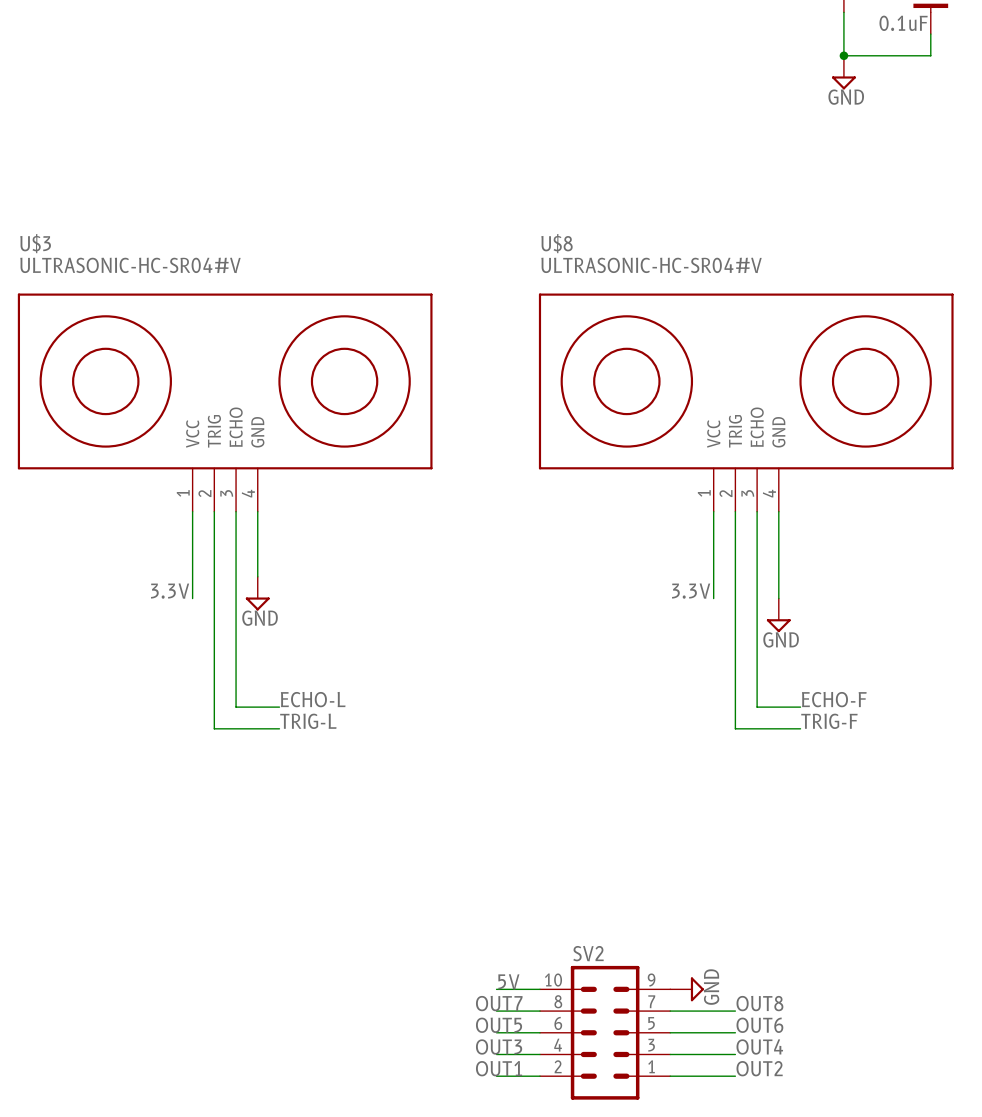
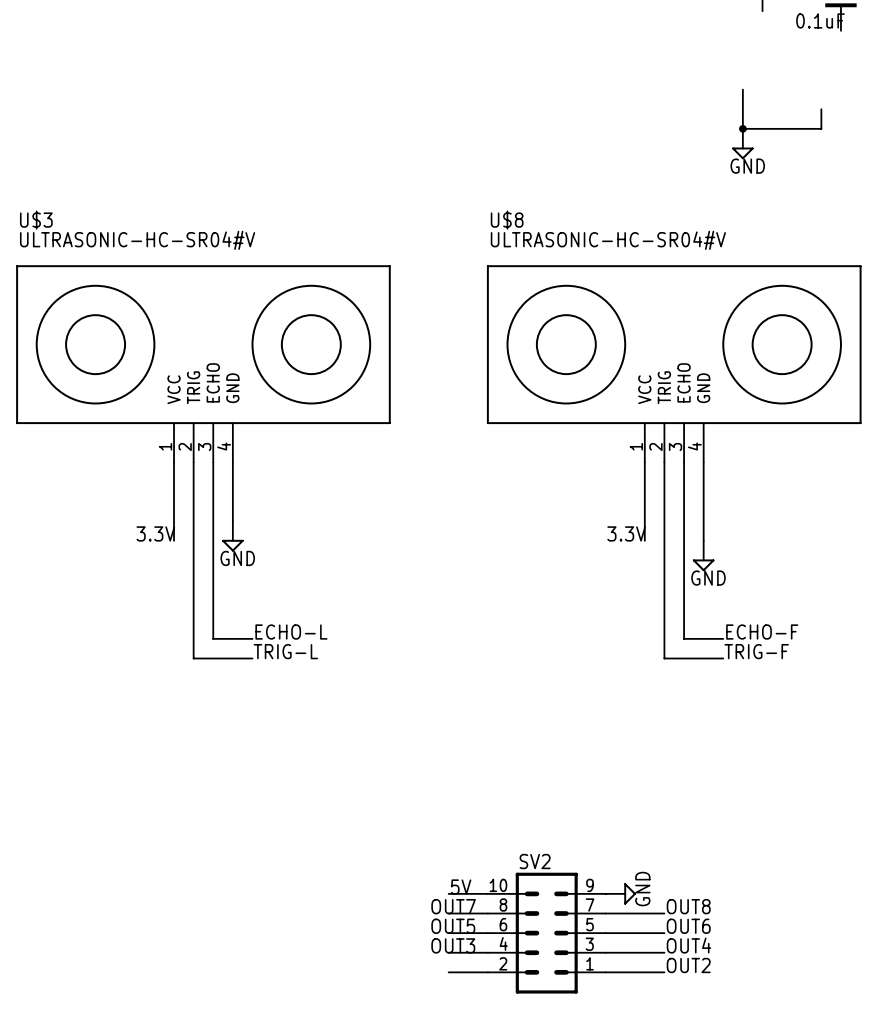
wire: (843, 12) (843, 55) (930, 55) (930, 34) -> (742, 89) (742, 128) (821, 128) (821, 109)
junction: (843, 55) -> none
power symbol position: GND (843, 72) -> GND (742, 144)
junction: none -> (742, 128)
label: OUT1 (499, 1068) -> none

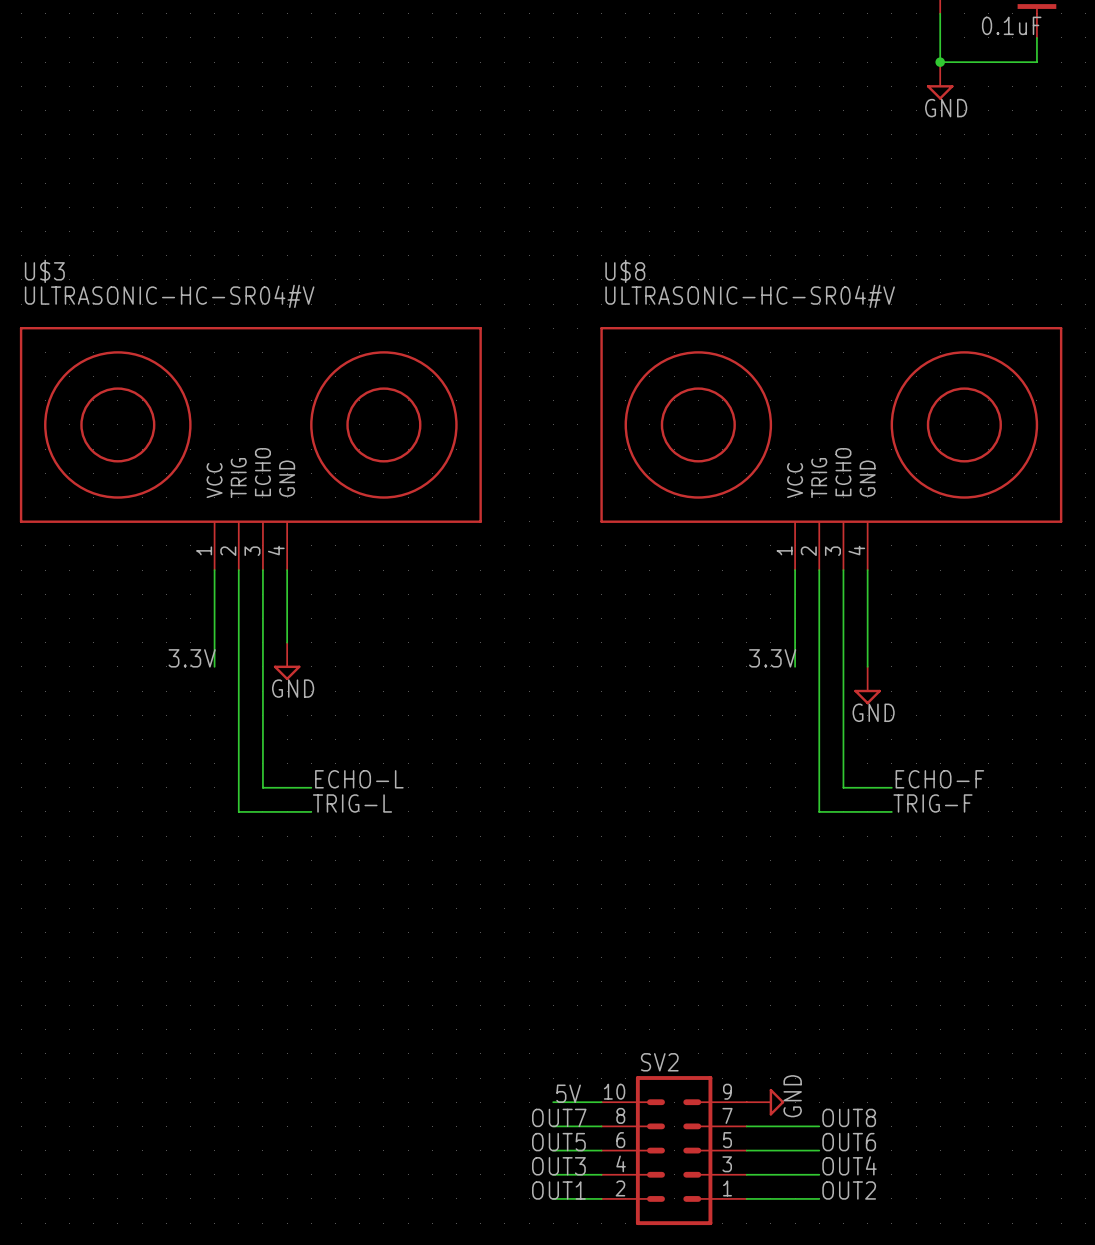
junction: none -> (940, 62)
wire: (742, 89) (742, 128) (821, 128) (821, 109) -> (940, 13) (940, 62) (1036, 62) (1036, 37)
junction: (742, 128) -> none
power symbol position: GND (742, 144) -> GND (940, 80)
label: none -> OUT1 (558, 1190)

